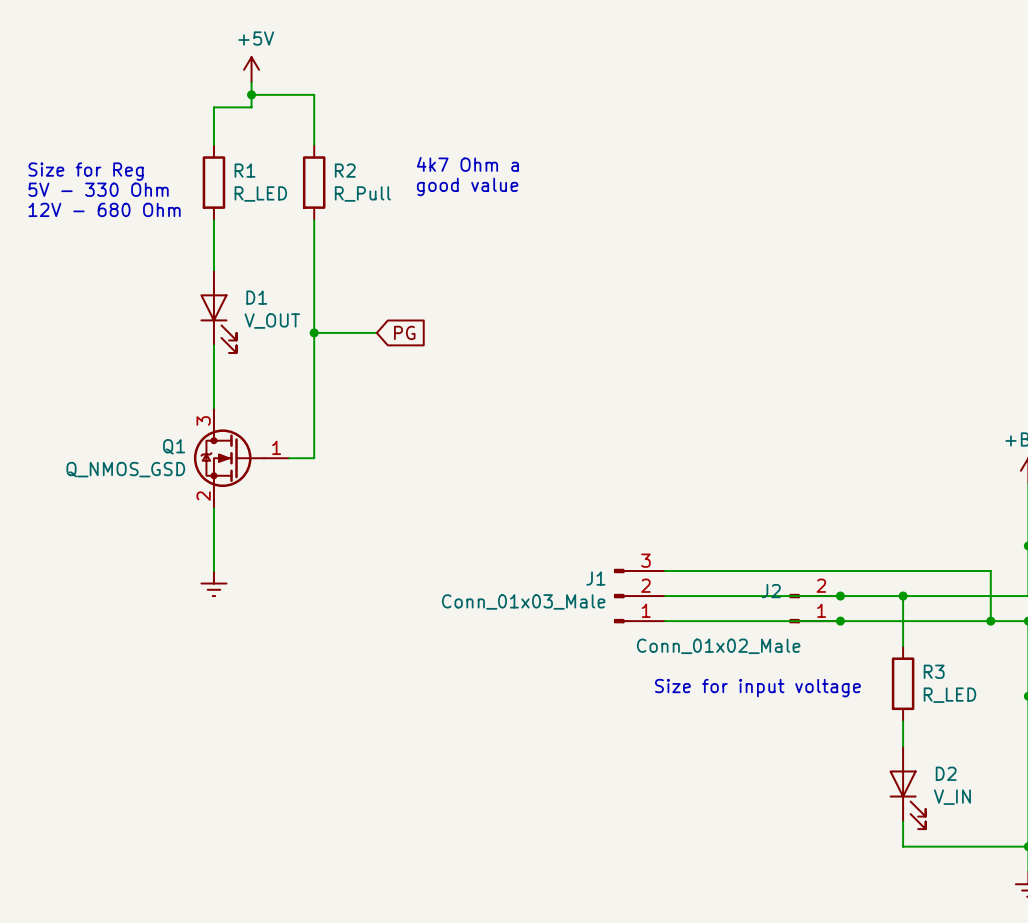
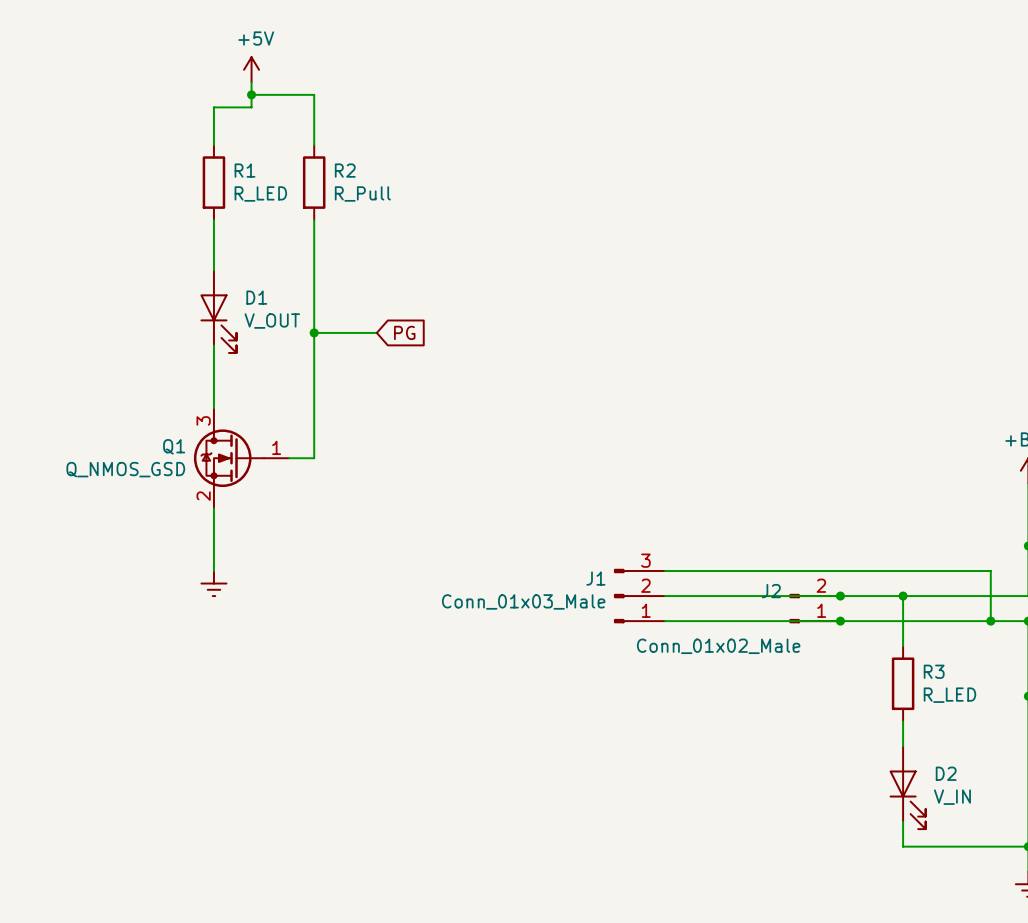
text: 4k7 Ohm a (467, 164) -> none
text: Size for Reg (86, 171) -> none
text: good value (467, 186) -> none
text: 5V - 330 Ohm (98, 189) -> none
text: 12V - 680 Ohm (104, 209) -> none
text: Size for input voltage (757, 688) -> none

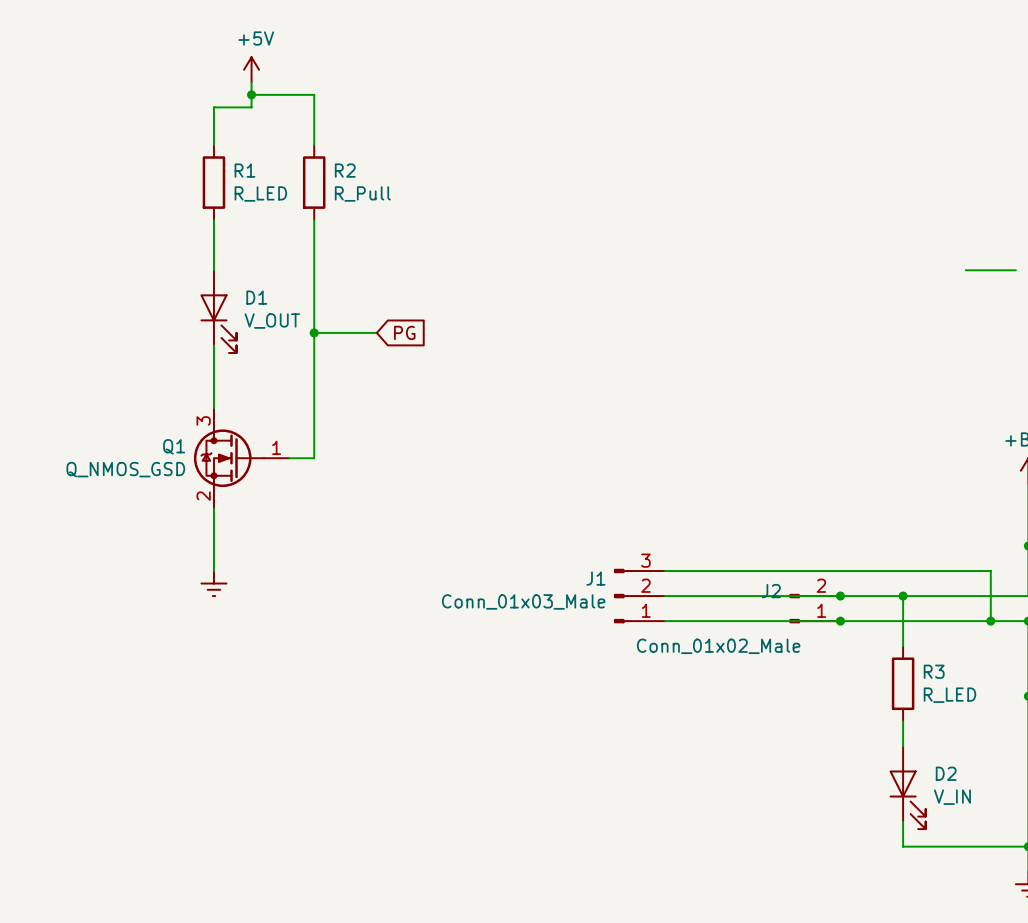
wire: none -> (965, 270) (1015, 270)

